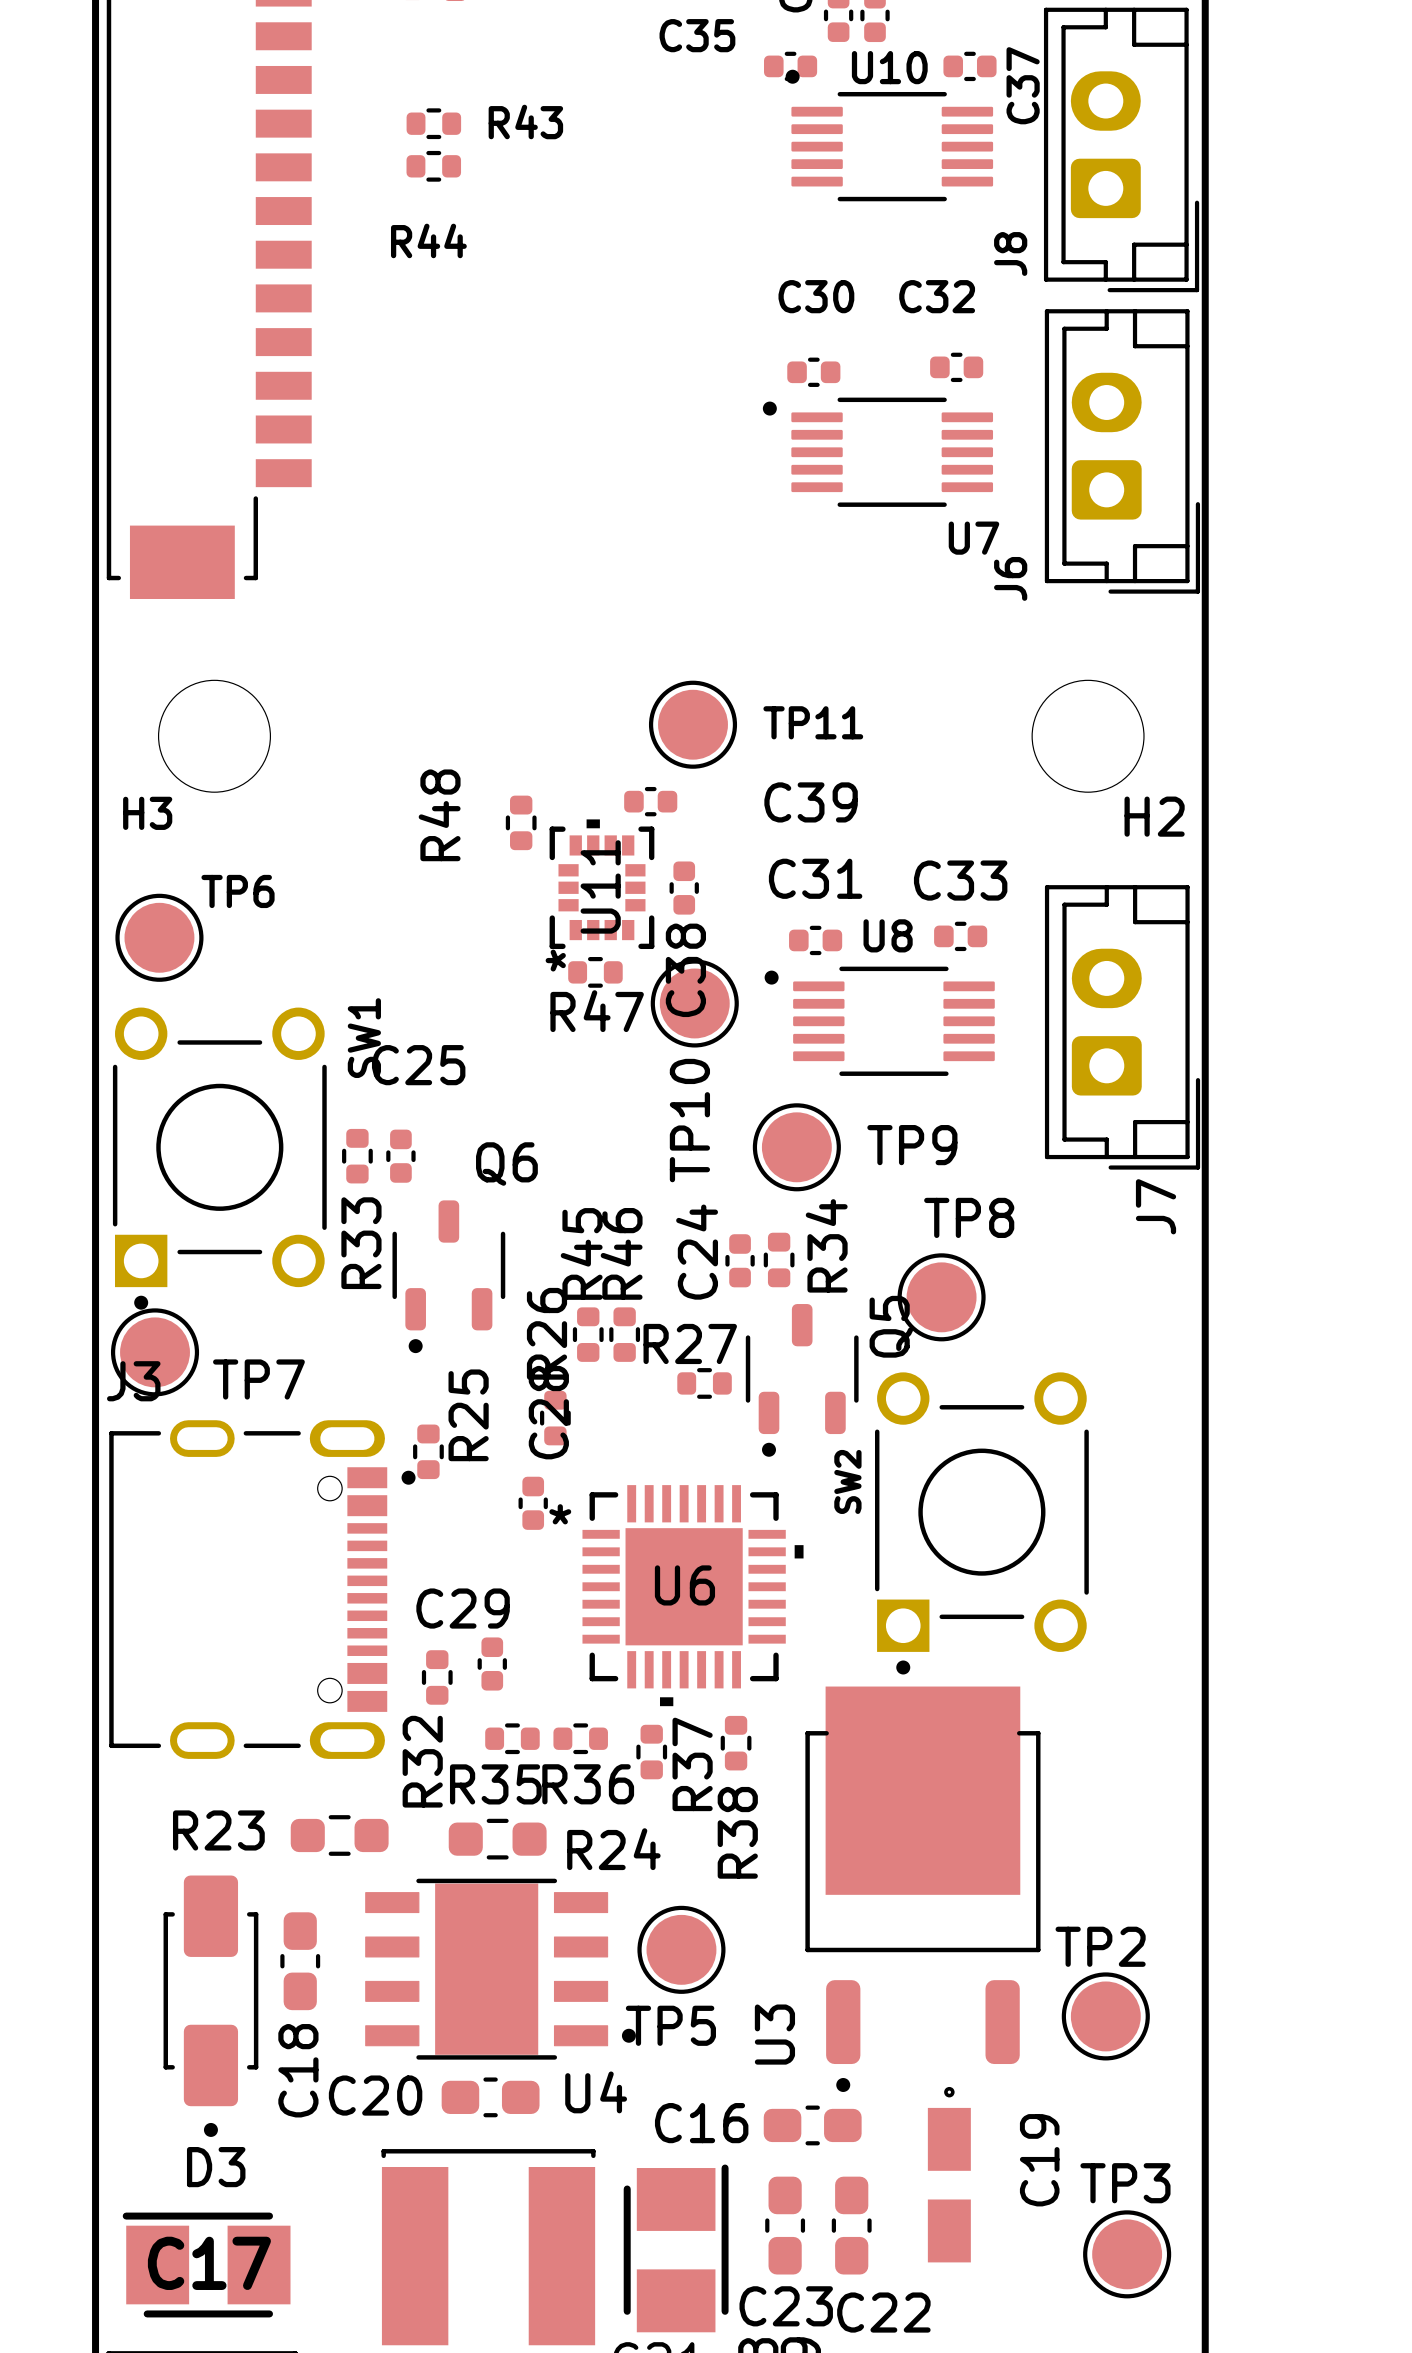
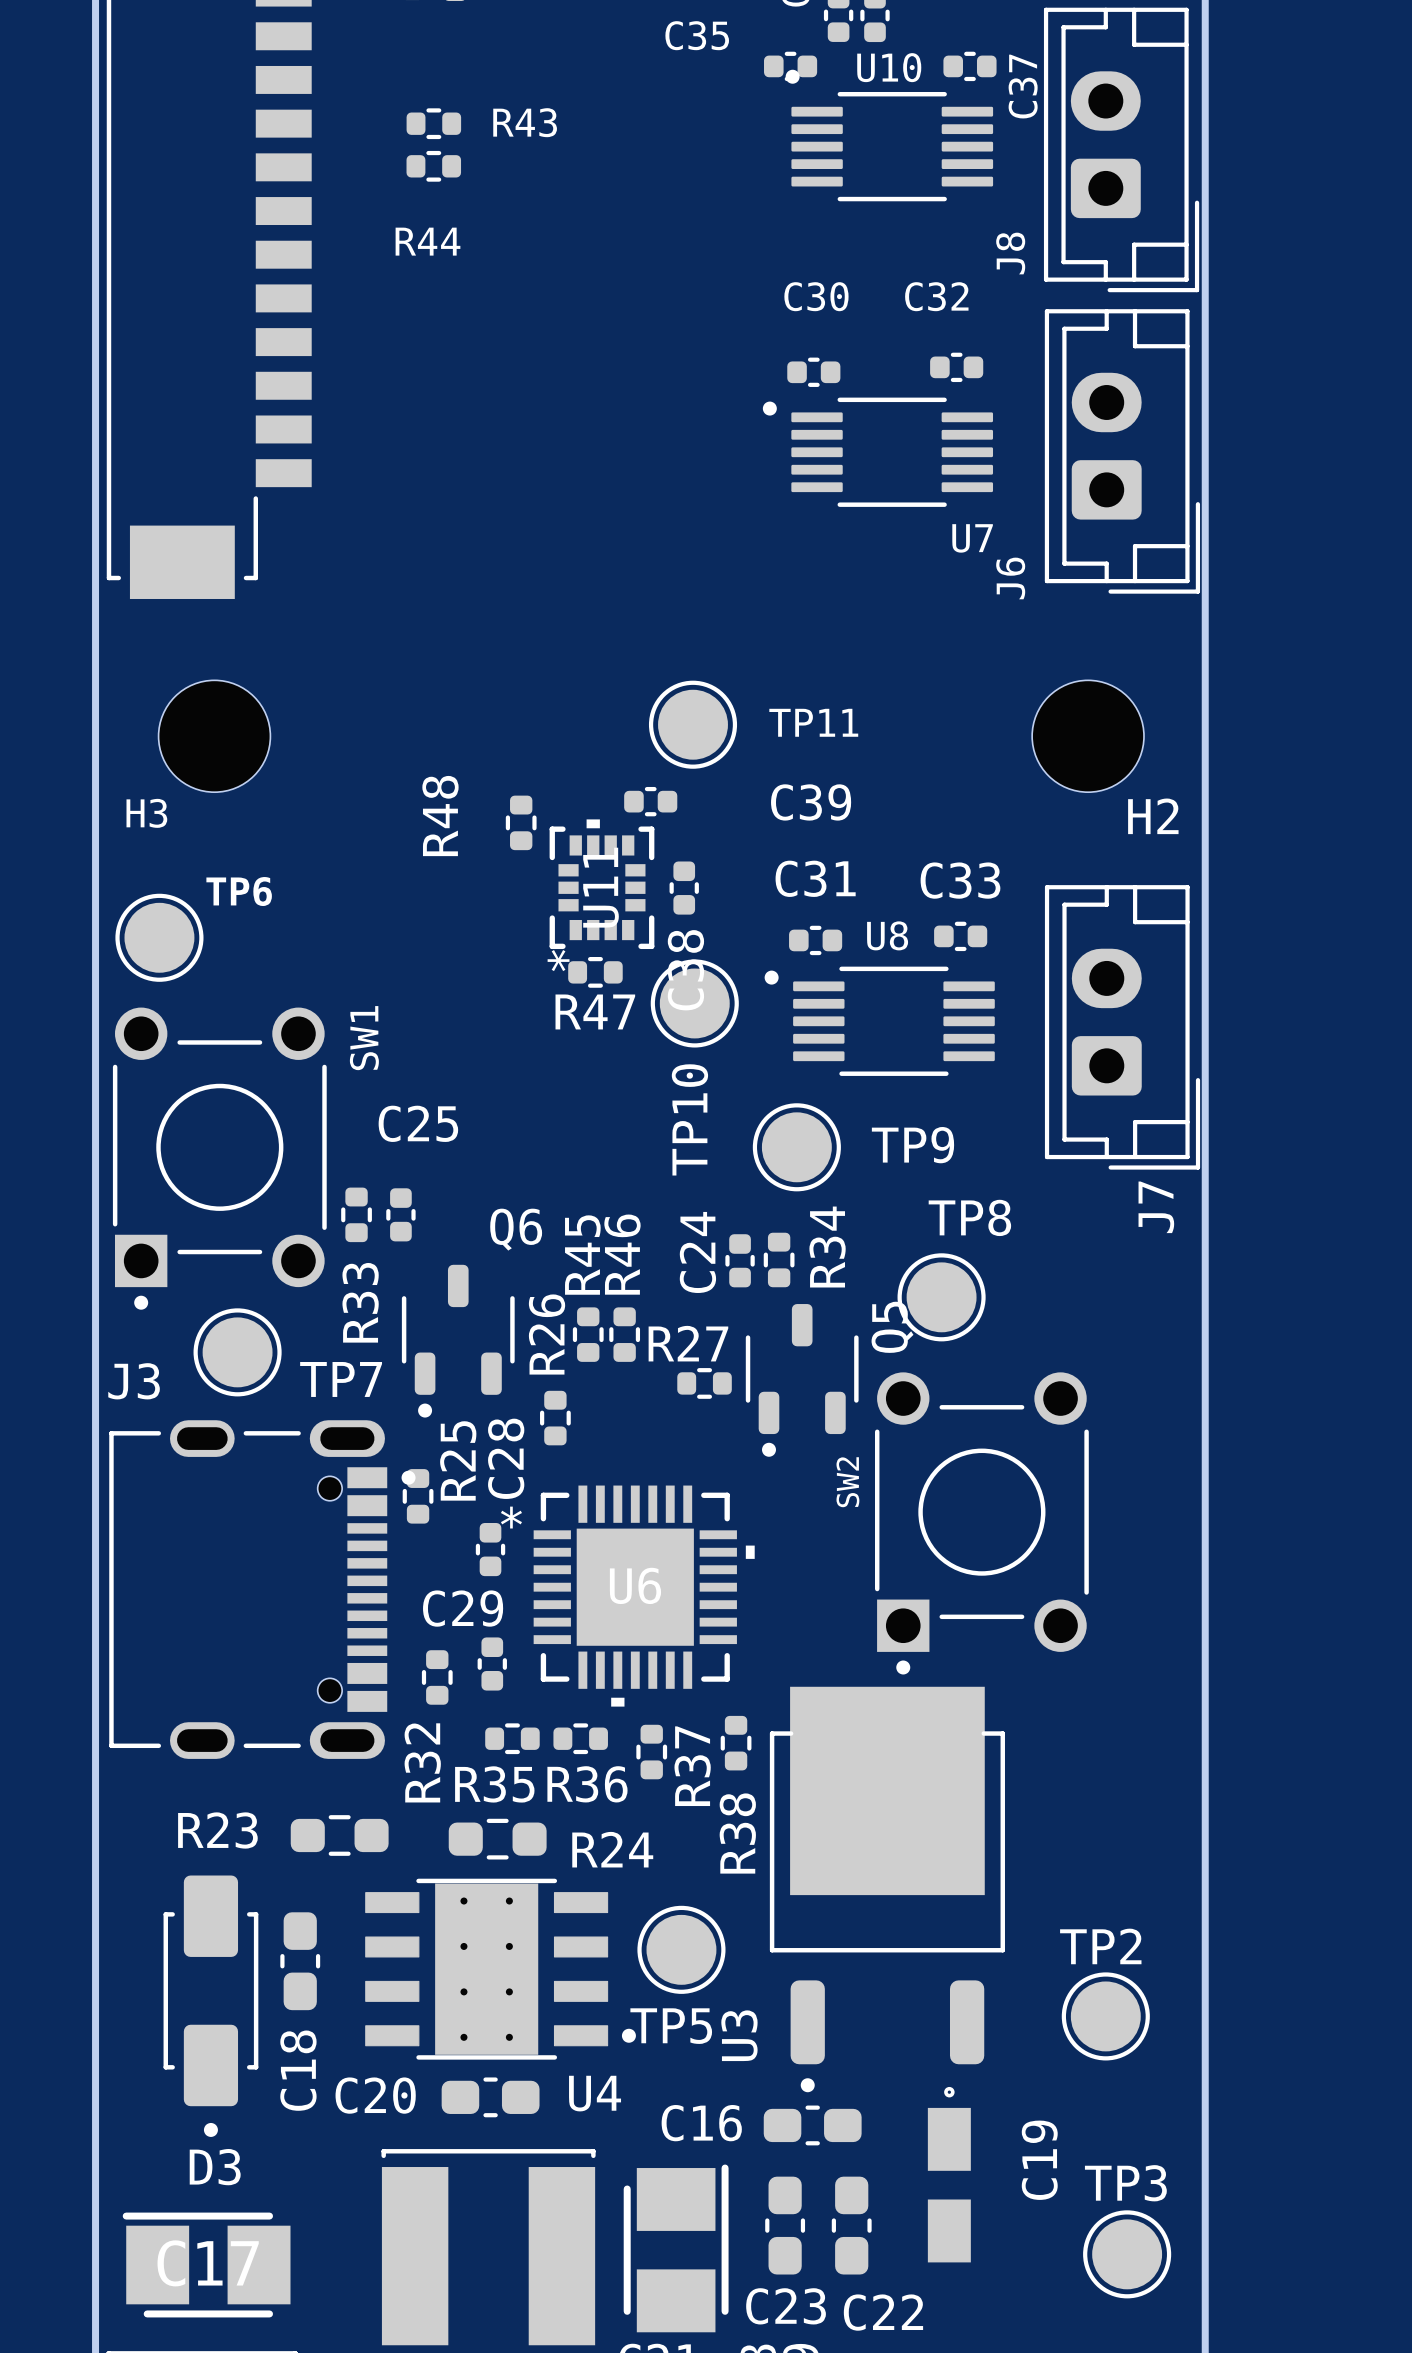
R33 position: (357, 1156) -> (356, 1214)
C25 position: (400, 1156) -> (400, 1214)
Q6 position: (448, 1276) -> (458, 1341)
TP7 position: (155, 1352) -> (237, 1352)
R25 position: (428, 1451) -> (418, 1496)
C28 position: (533, 1503) -> (490, 1549)
U6 position: (693, 1595) -> (644, 1596)
U4 footprint: [365, 1878, 636, 2060] -> [365, 1878, 636, 2060]
U3 position: (922, 1889) -> (887, 1889)

